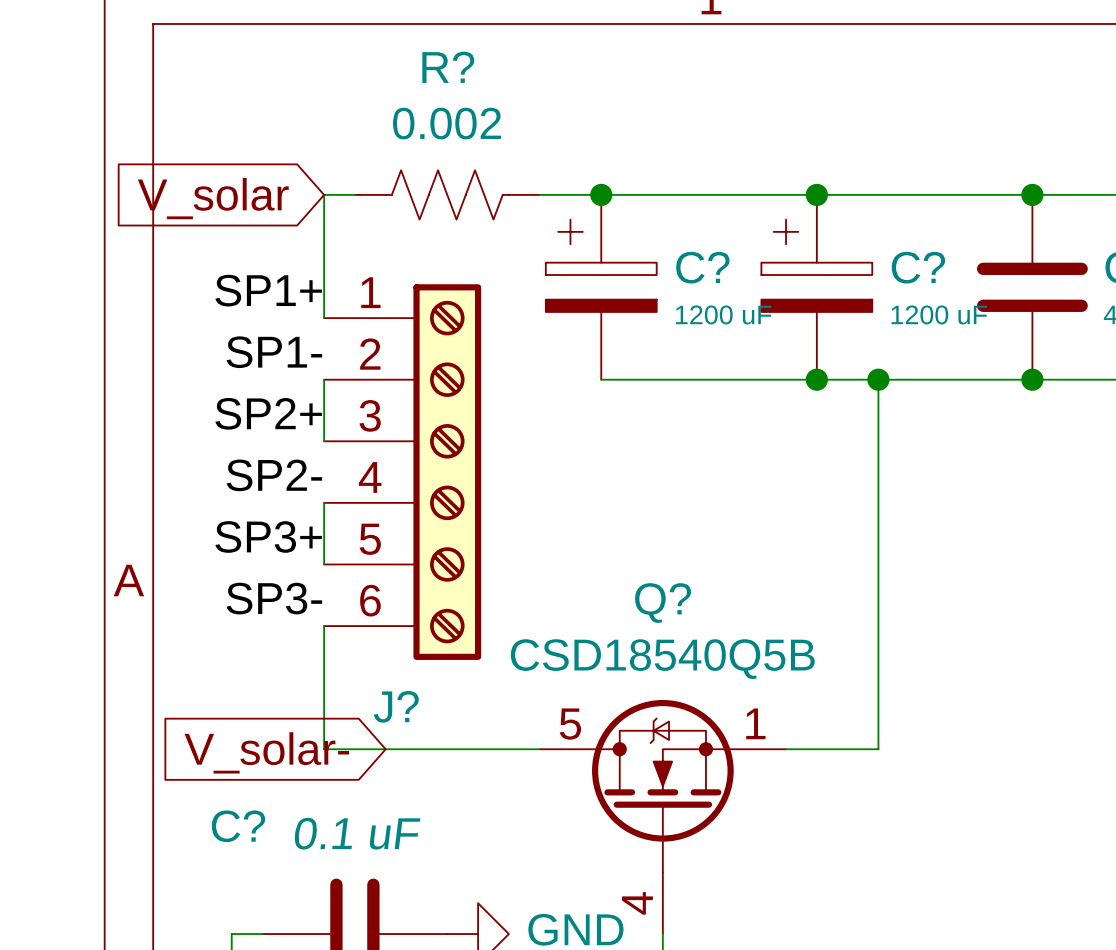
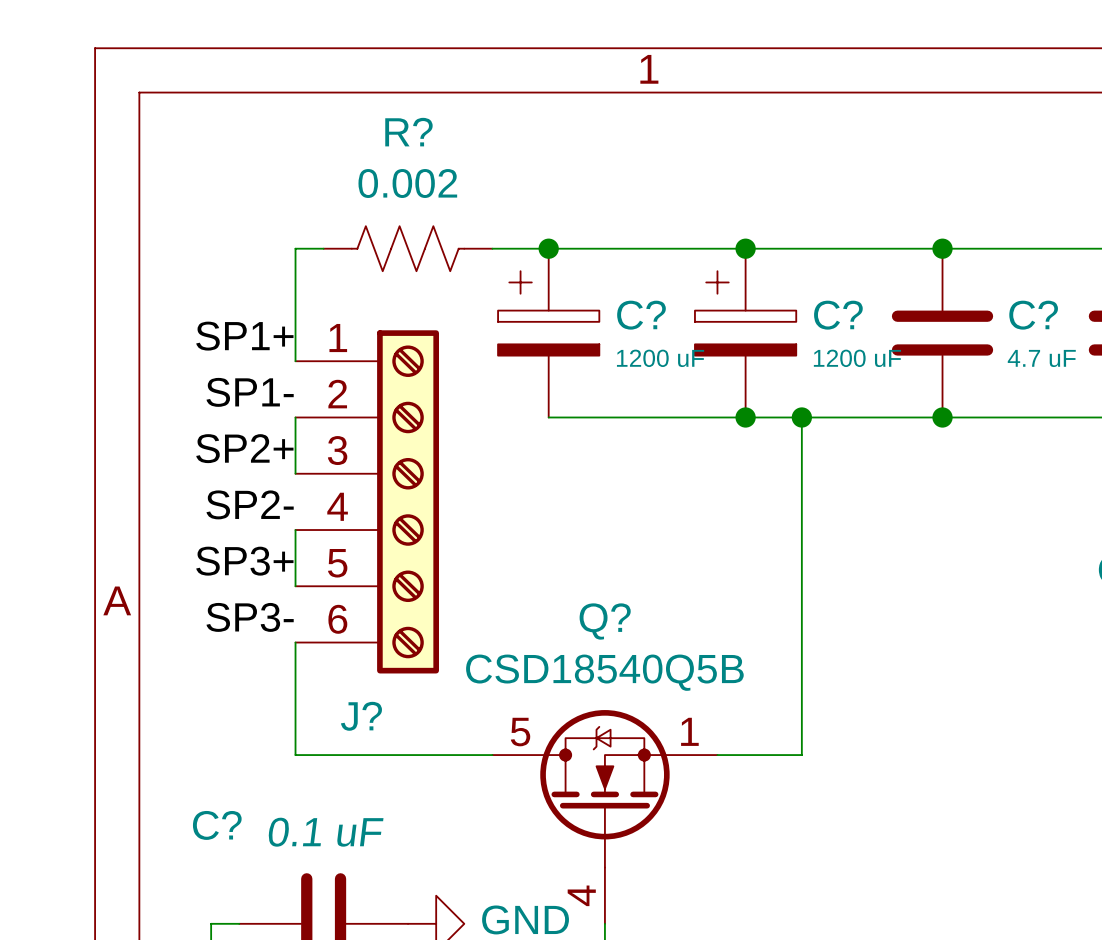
global label: V_solar (213, 198) -> none
global label: V_solar- (266, 752) -> none

